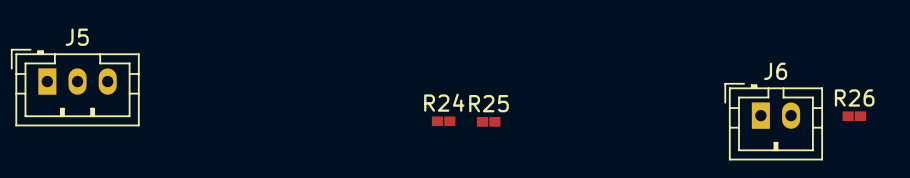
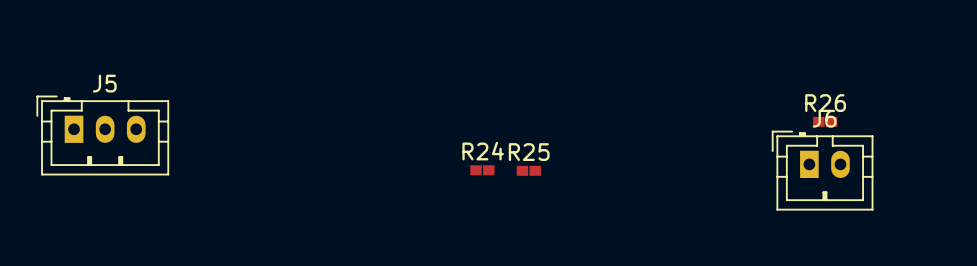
R26 position: (854, 116) -> (825, 121)

